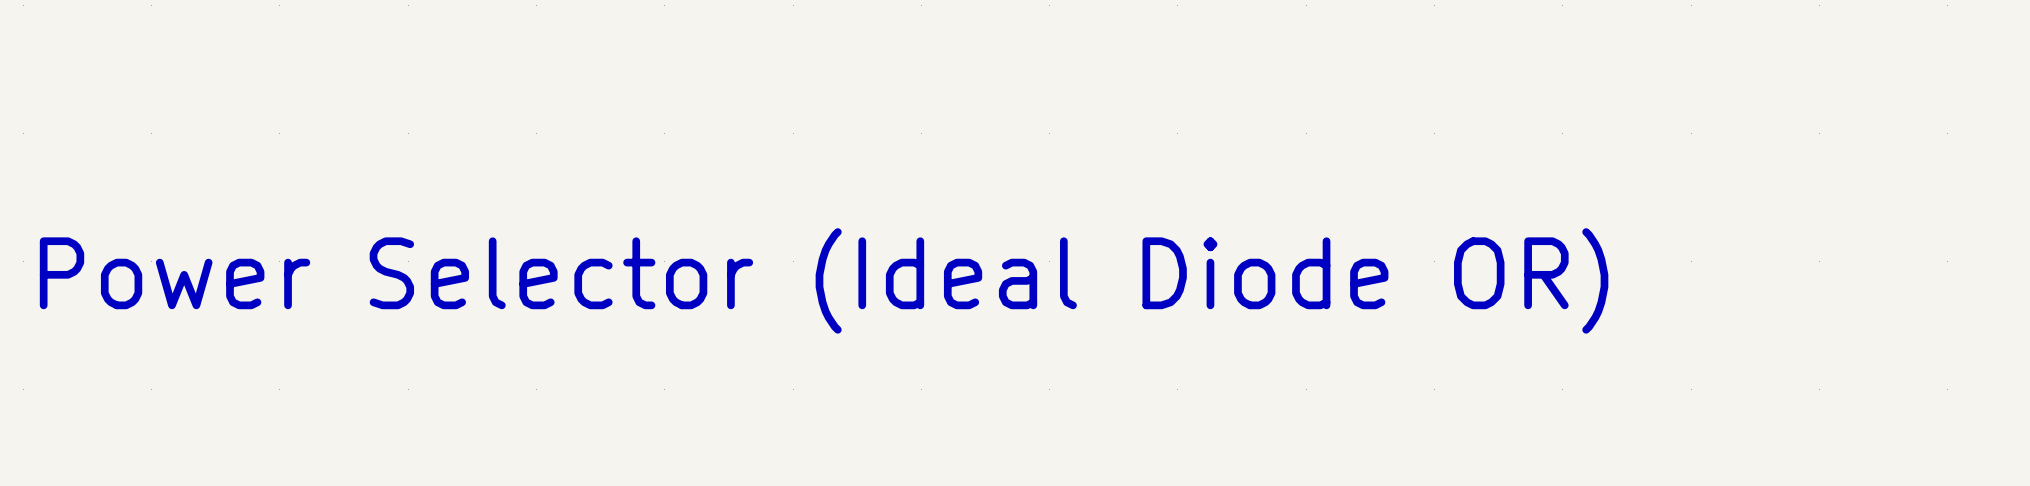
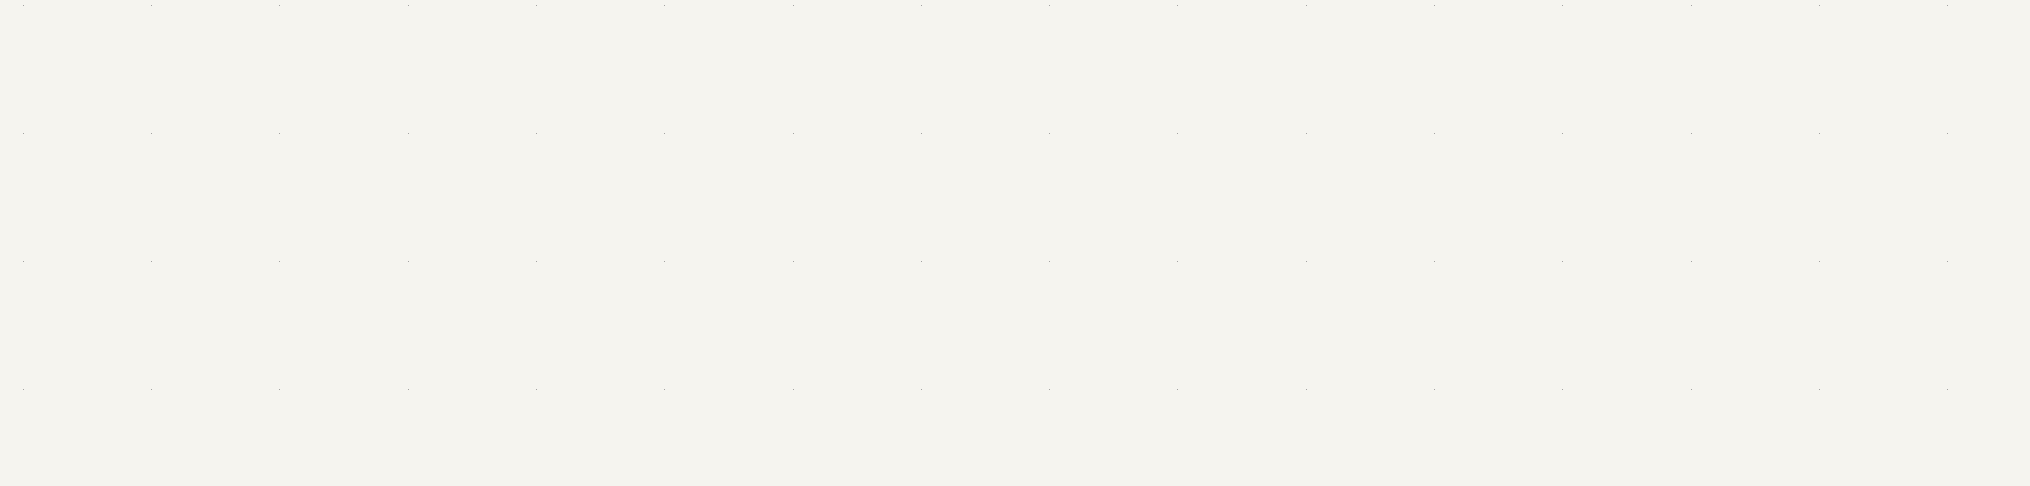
text: Power Selector (Ideal Diode OR) (824, 280) -> none

